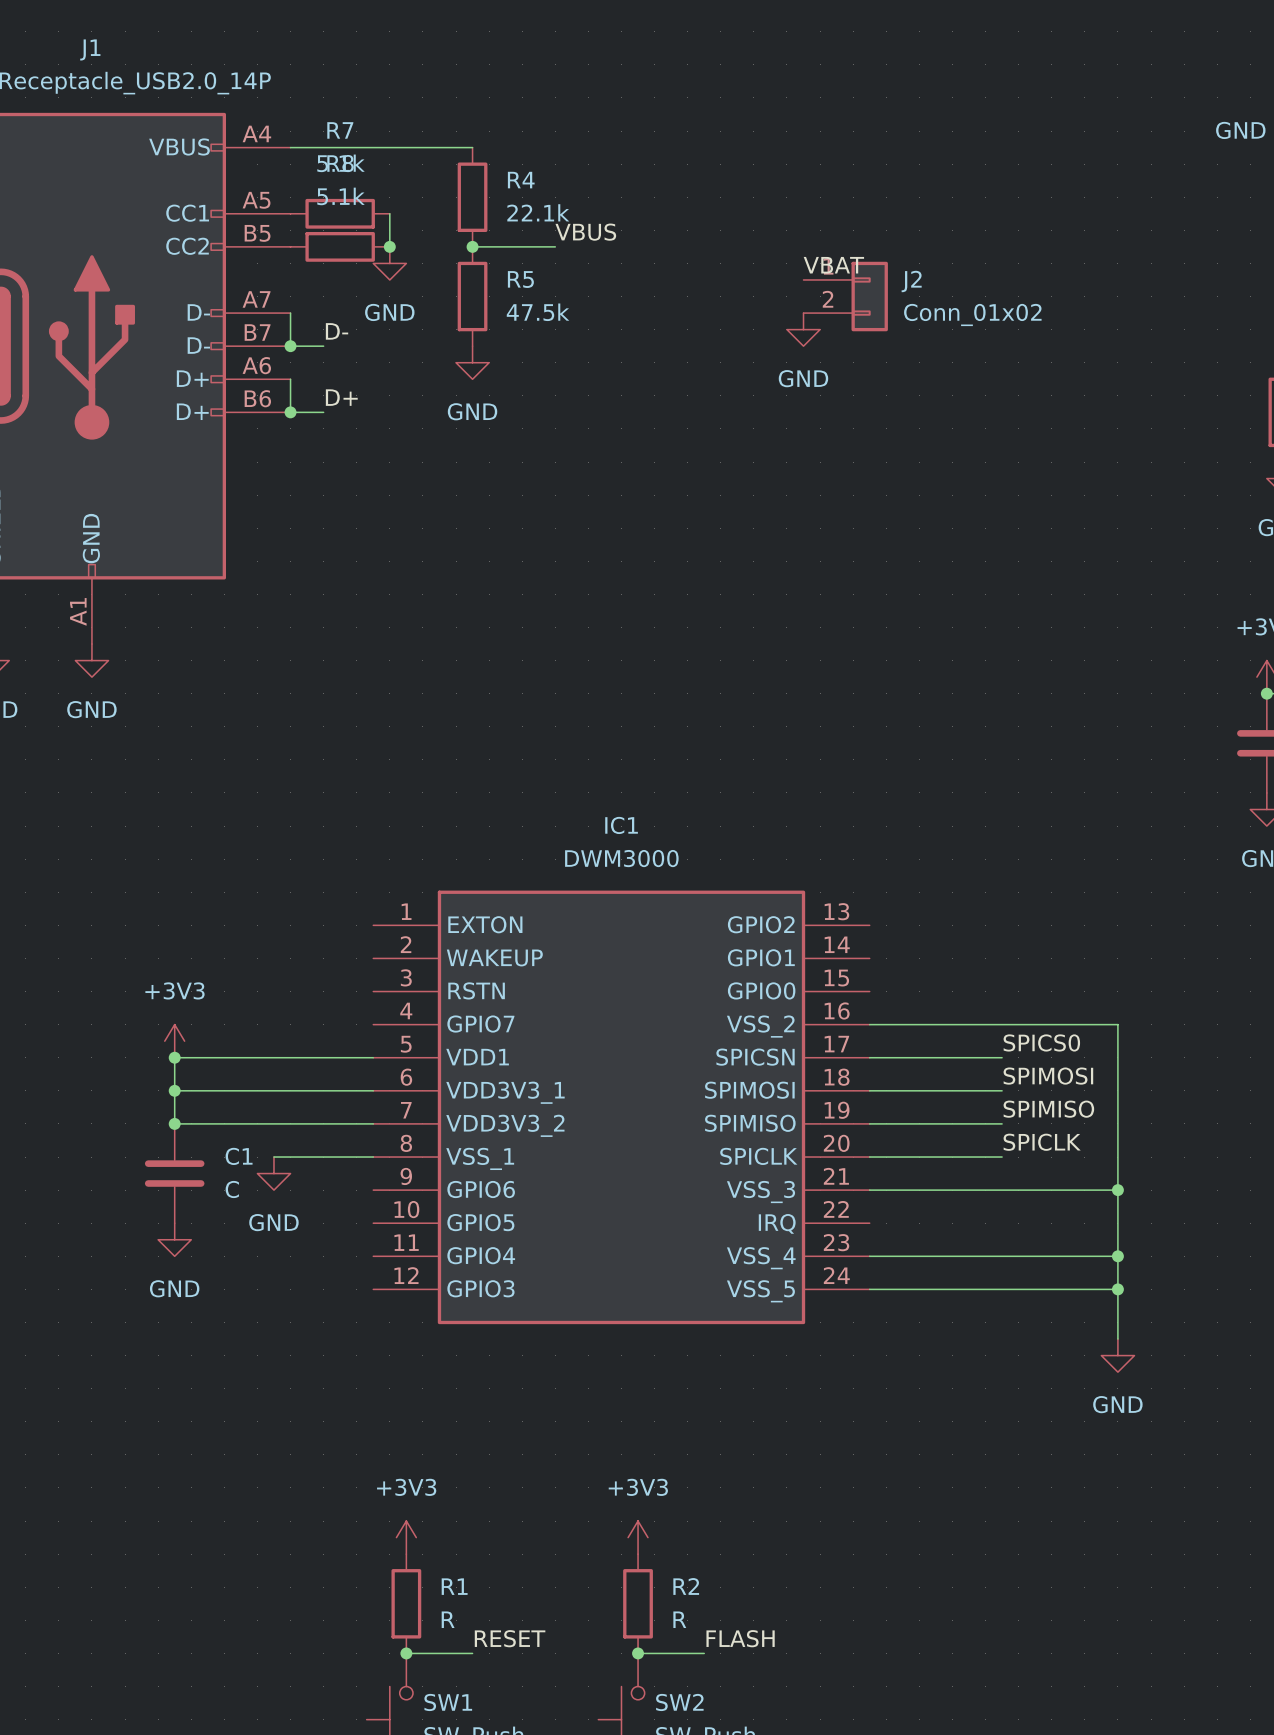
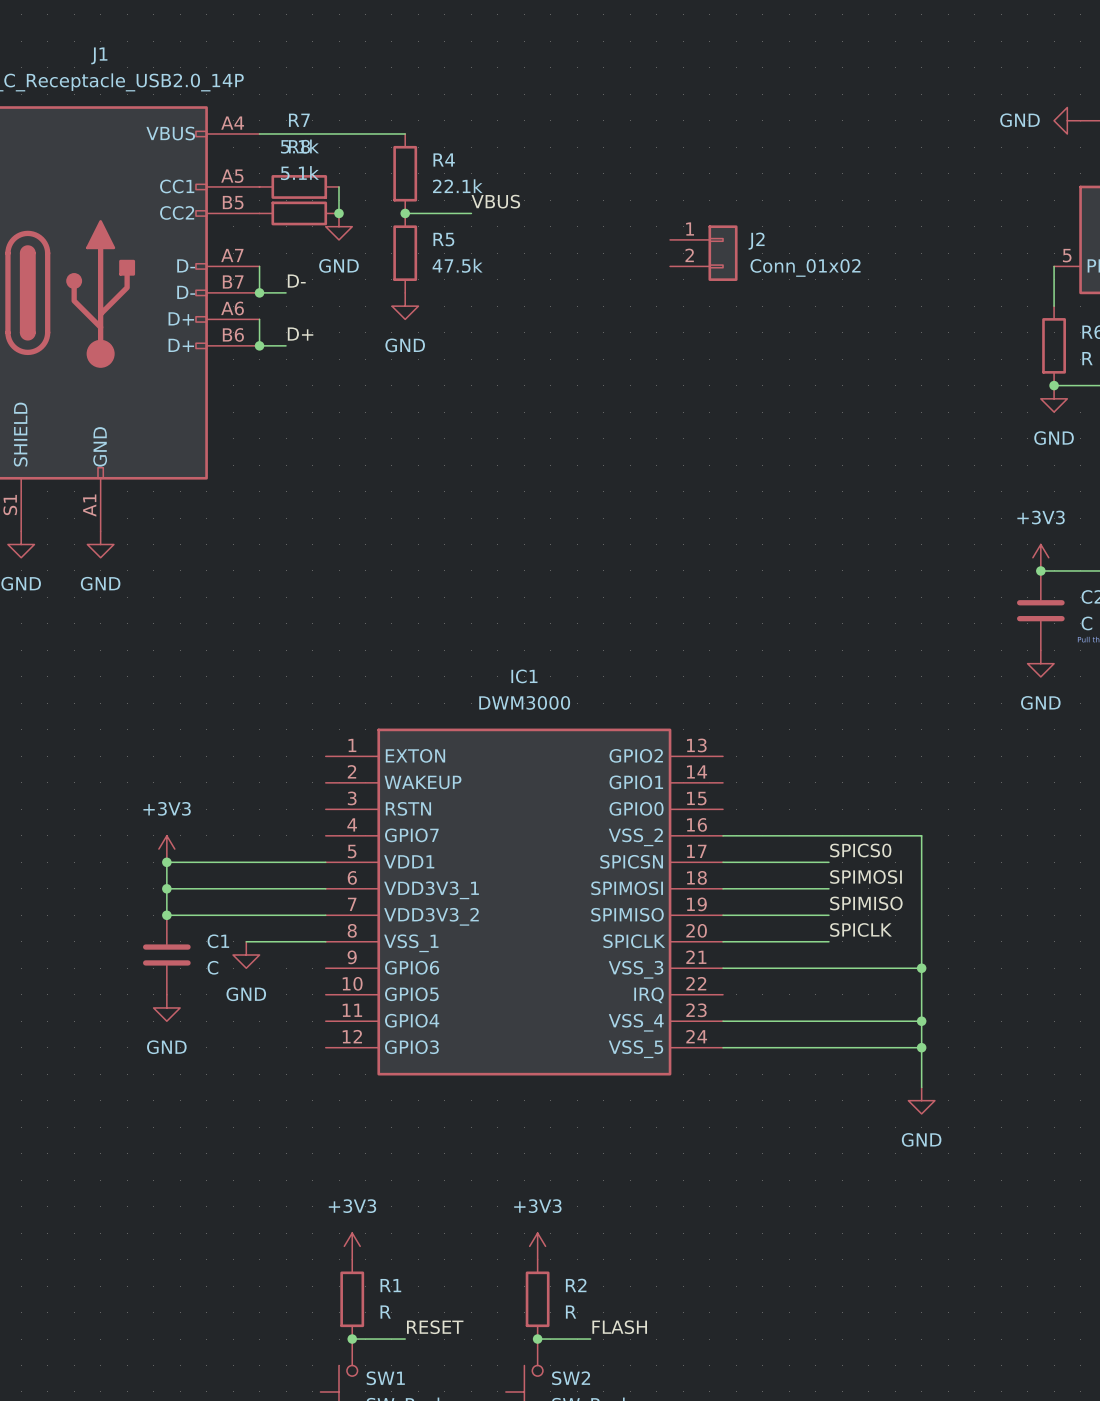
label: VBAT (833, 265) -> none
power symbol: GND (803, 329) -> none

